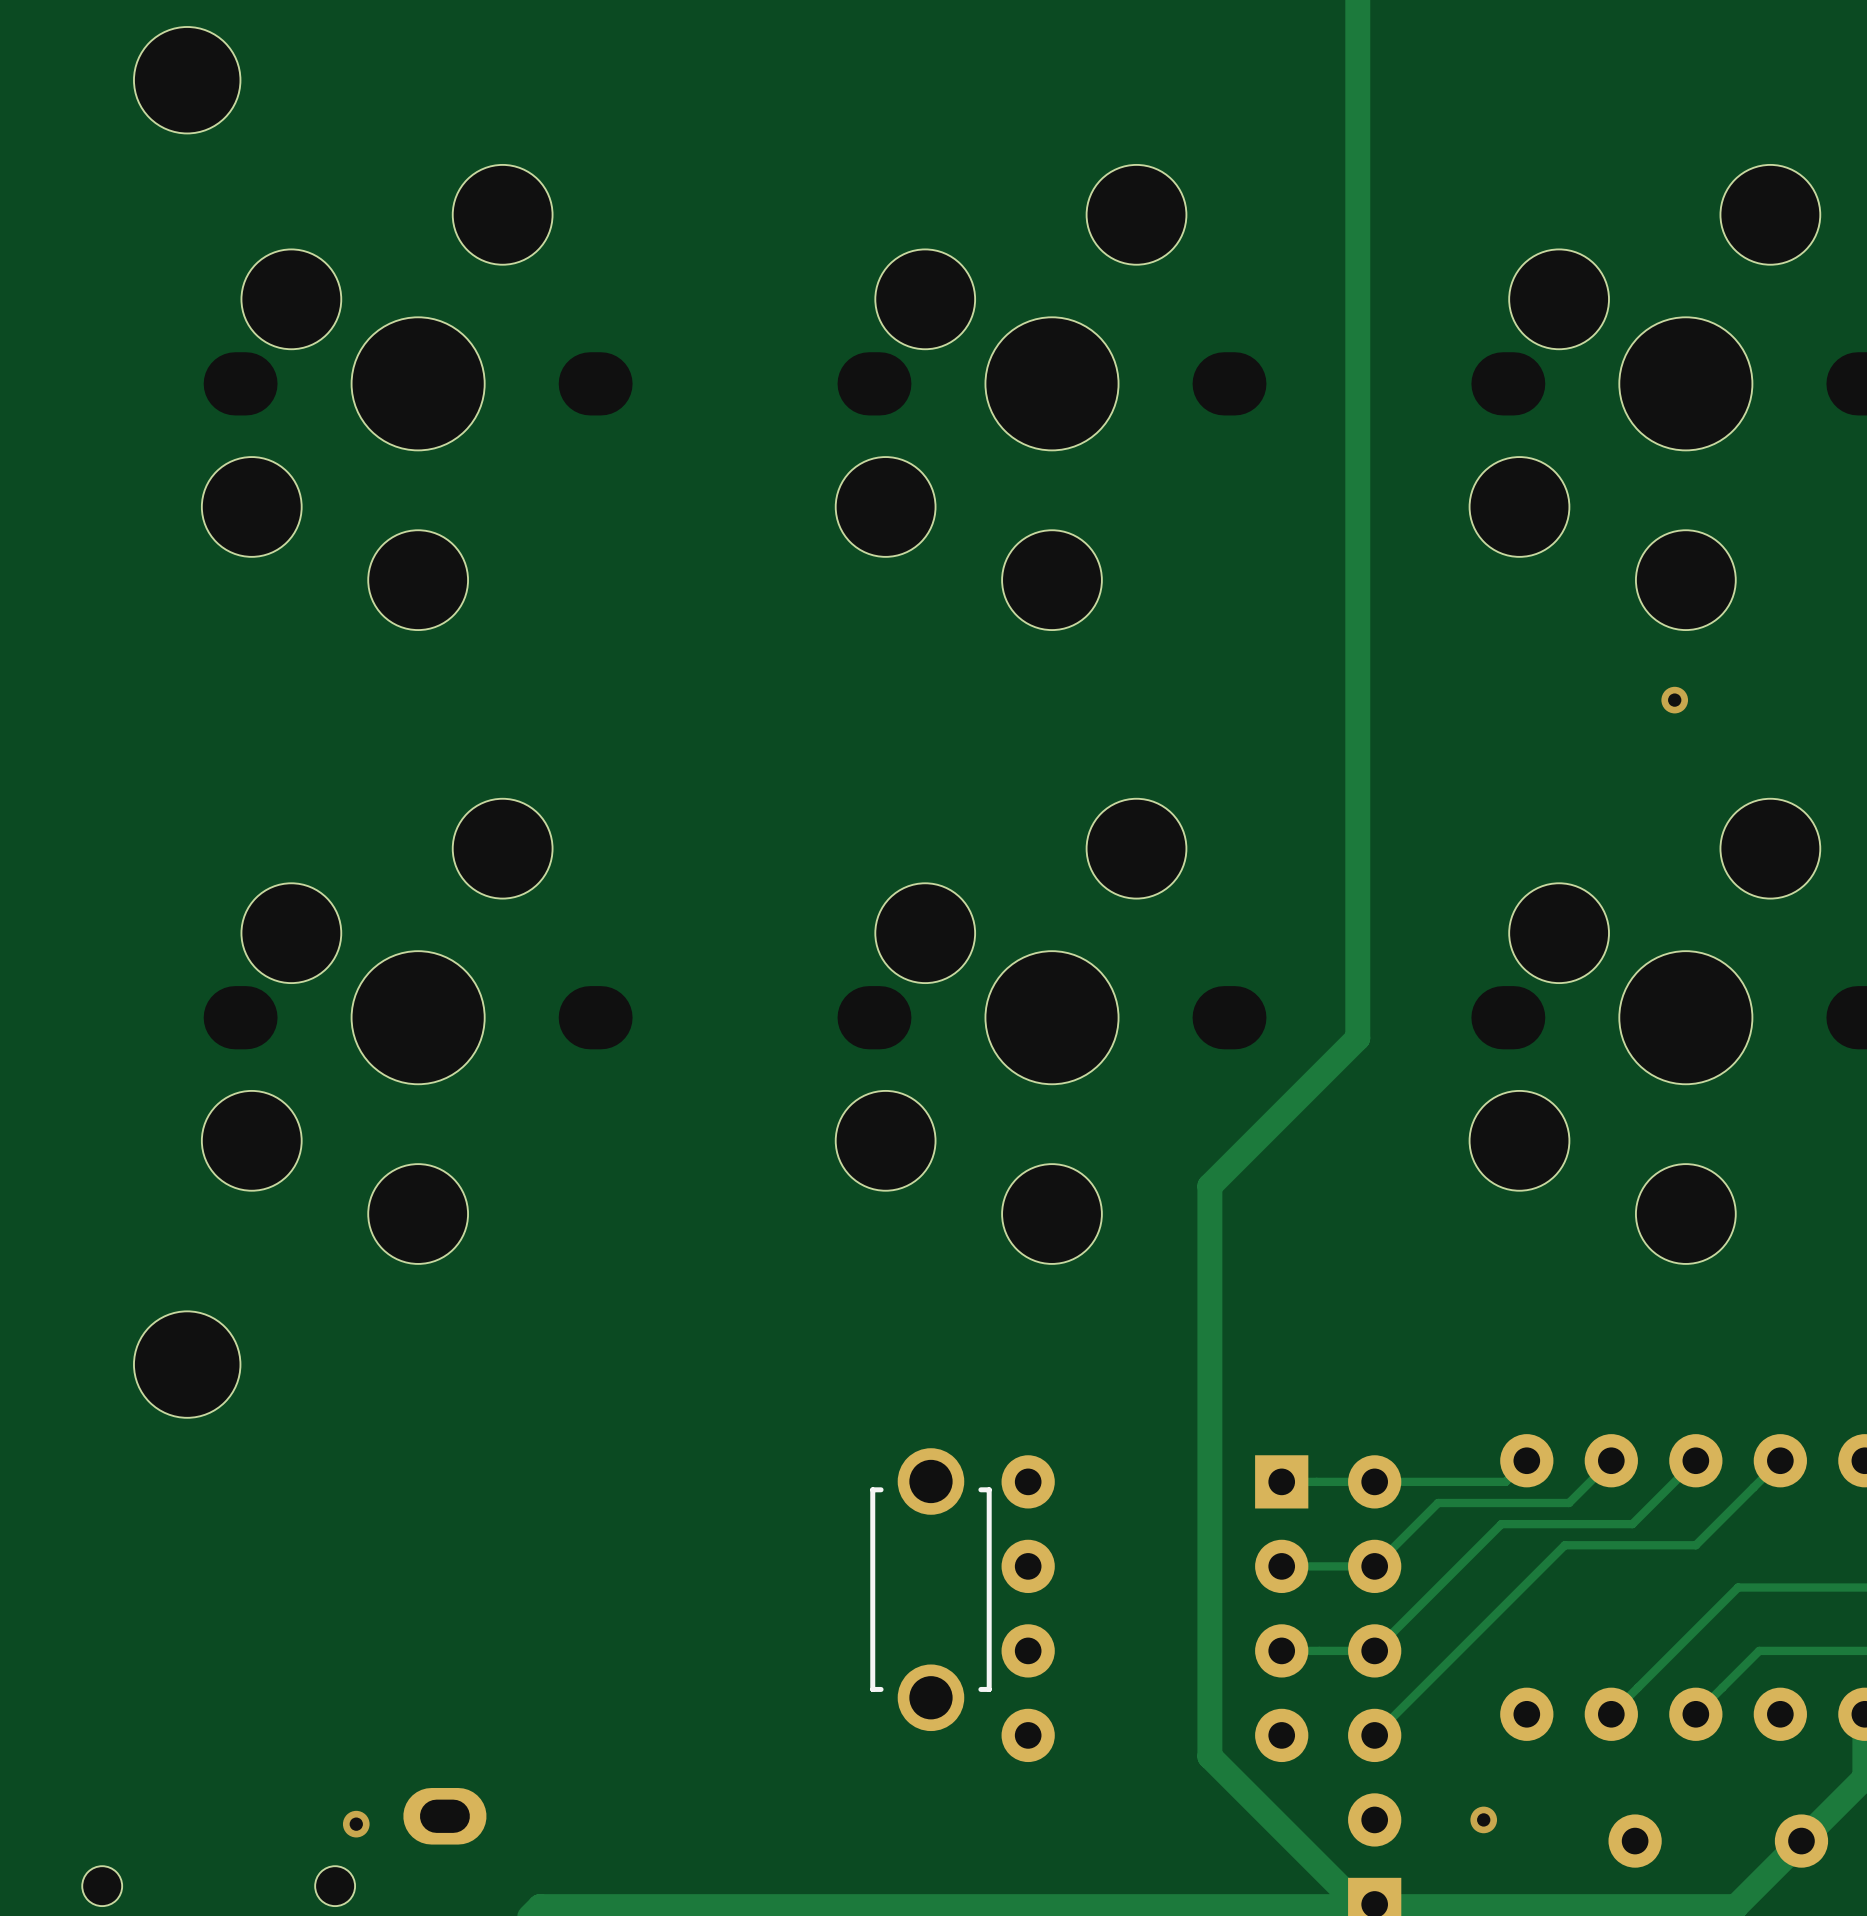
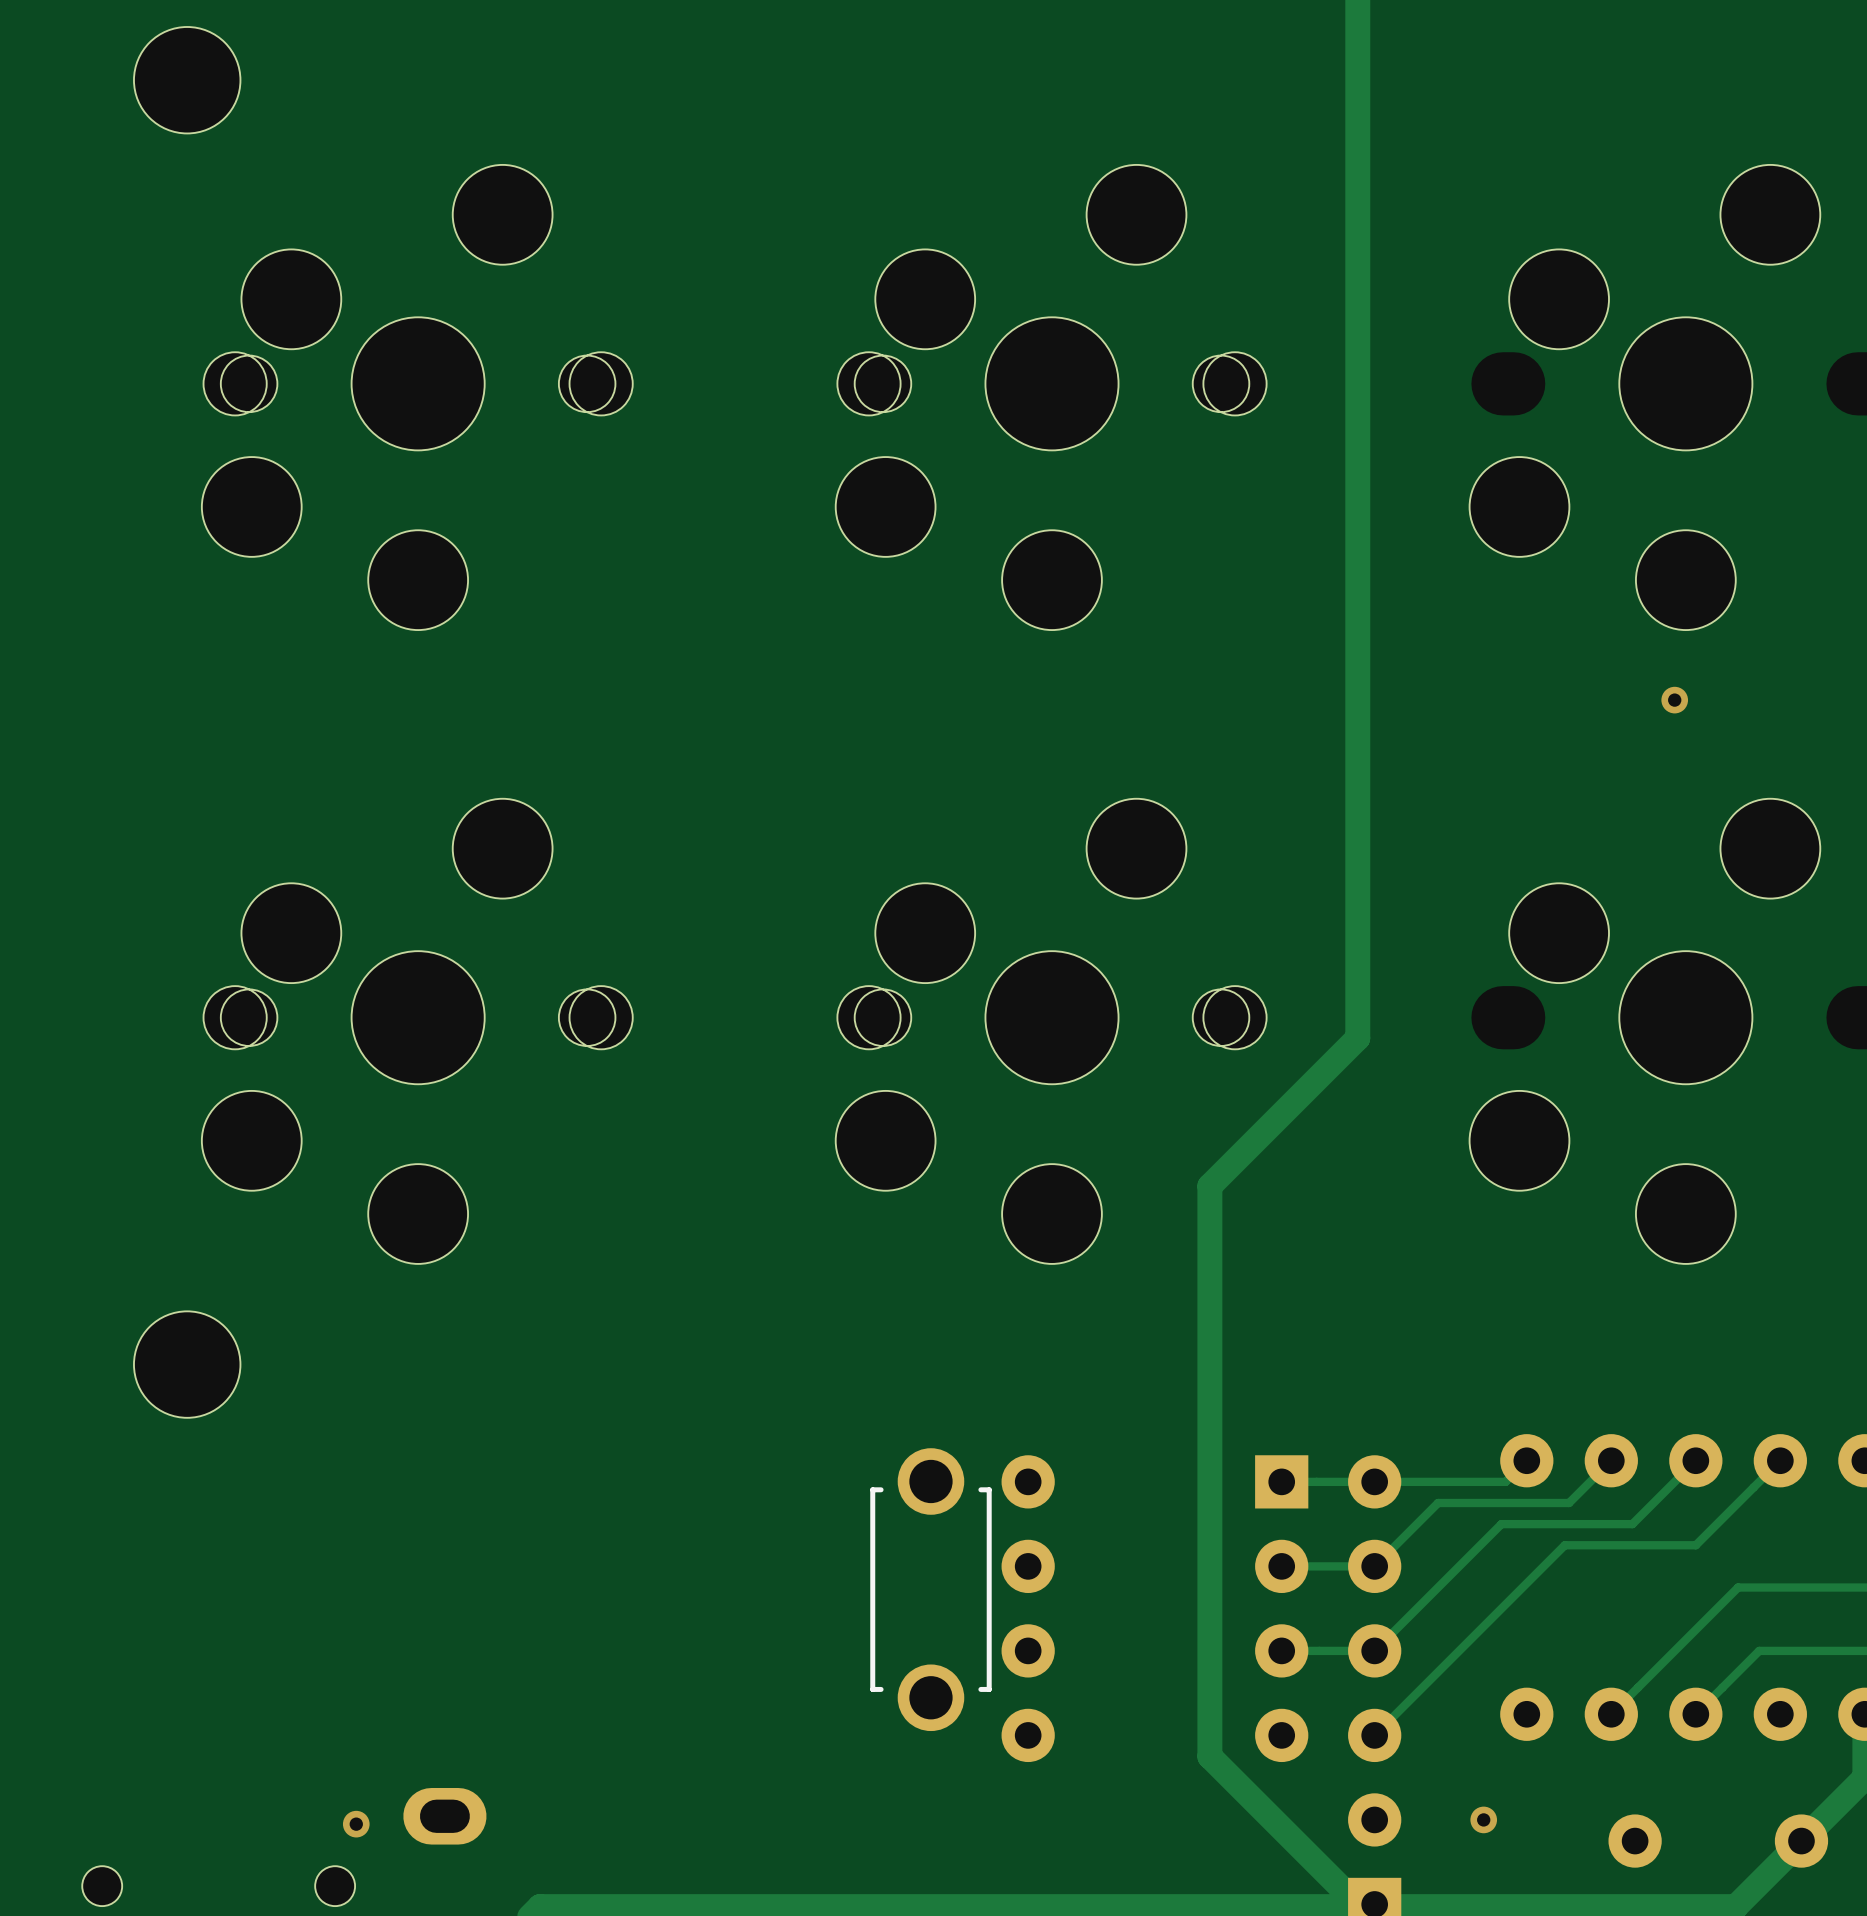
part footprint: [201, 164, 633, 631] -> [201, 164, 633, 631]
part footprint: [835, 164, 1267, 631] -> [835, 164, 1267, 631]
part footprint: [201, 798, 633, 1264] -> [201, 798, 633, 1264]
part footprint: [835, 798, 1267, 1264] -> [835, 798, 1267, 1264]

